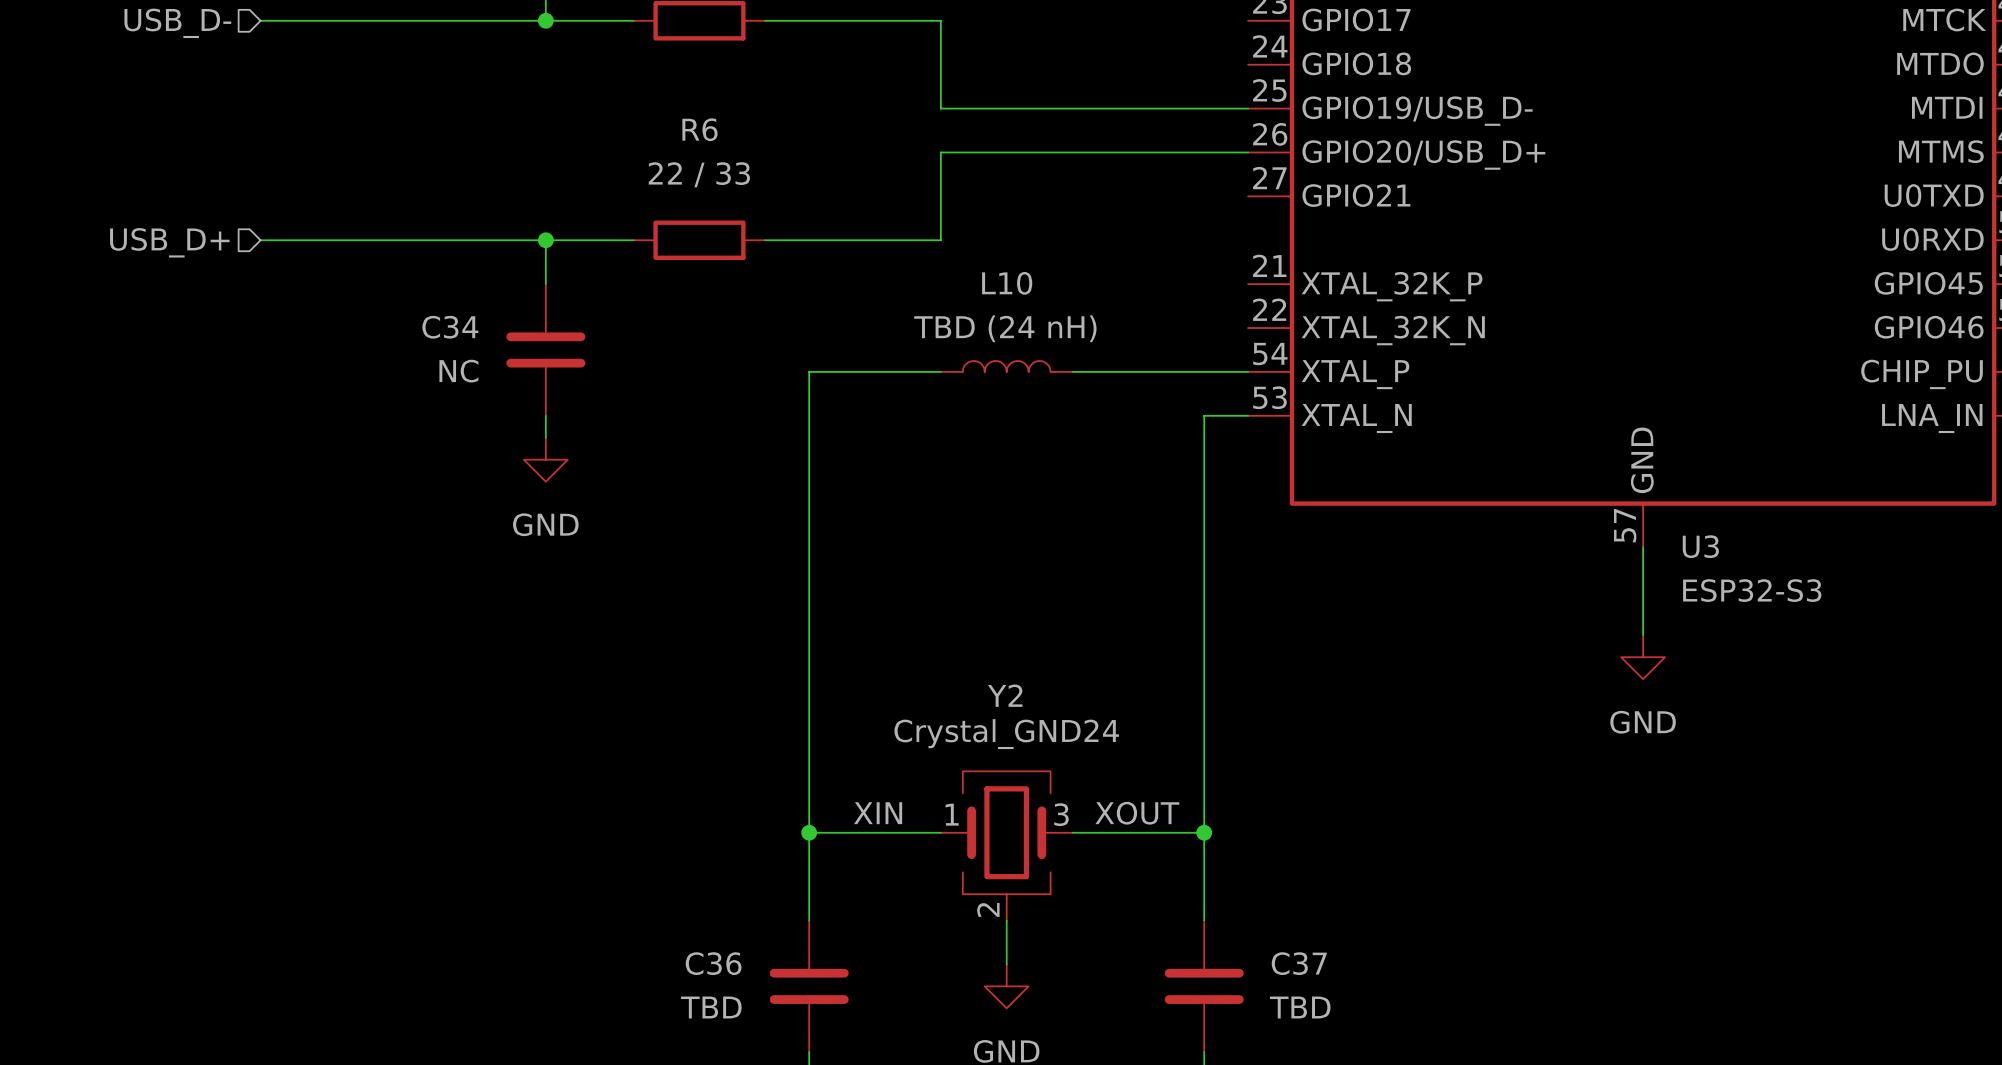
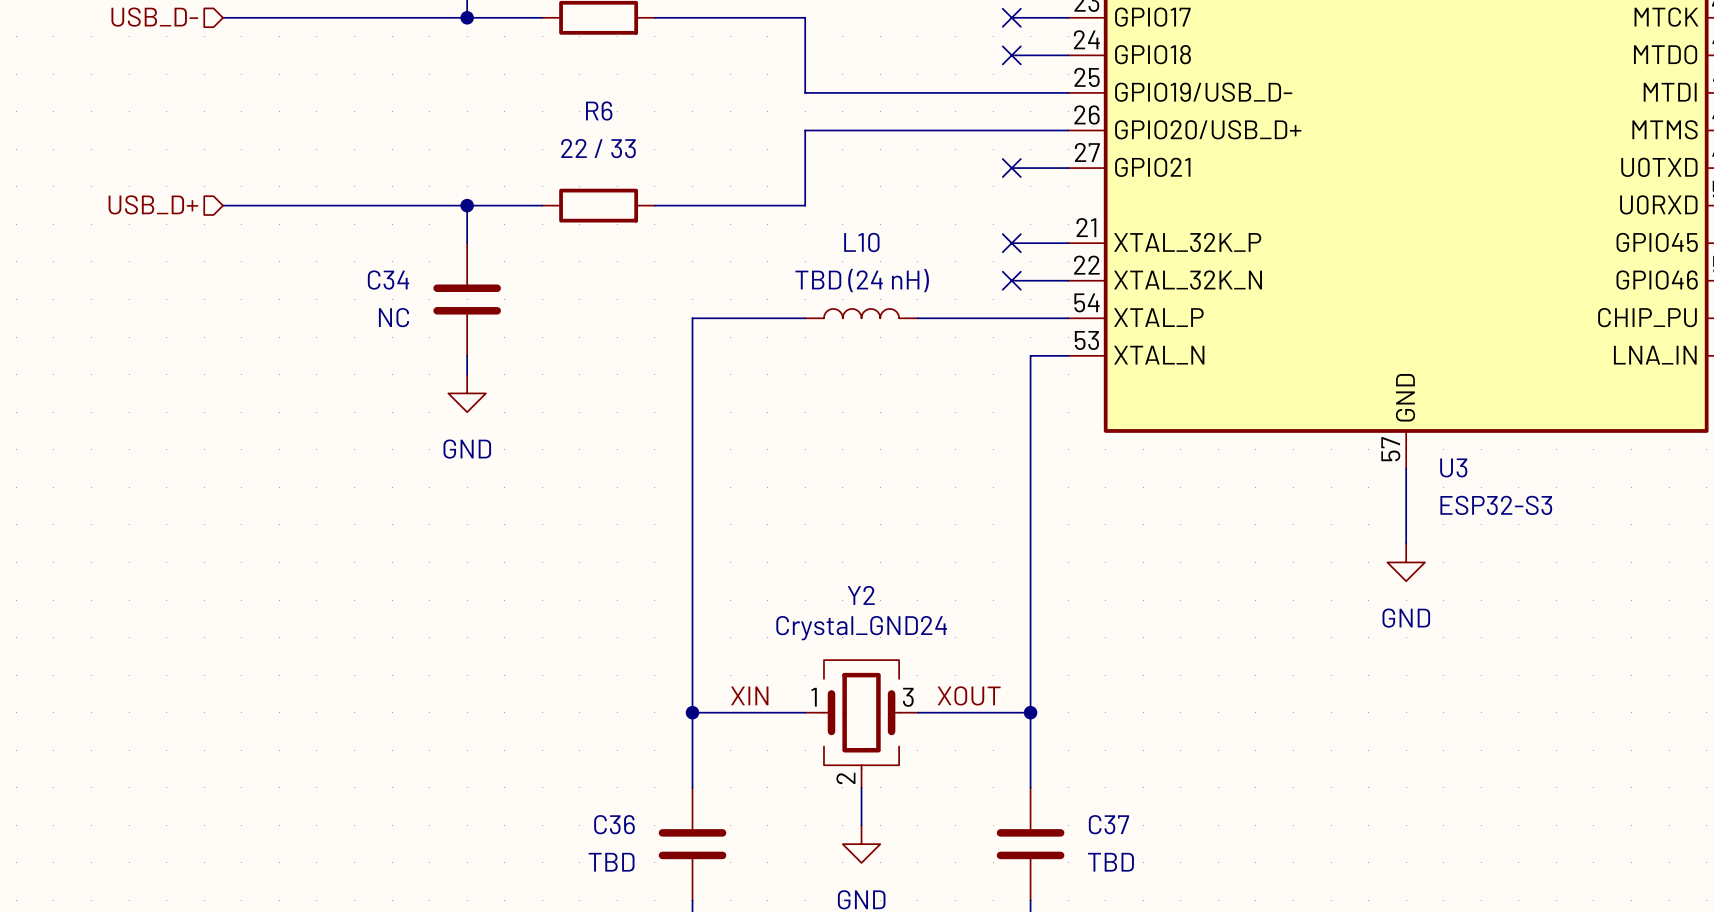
wire: none -> (1011, 17) (1068, 17)
no-connect mark: none -> (1011, 17)
wire: none -> (1011, 55) (1068, 55)
no-connect mark: none -> (1011, 55)
wire: none -> (1011, 168) (1068, 168)
no-connect mark: none -> (1011, 168)
wire: none -> (1011, 243) (1068, 243)
no-connect mark: none -> (1011, 243)
wire: none -> (1011, 280) (1068, 280)
no-connect mark: none -> (1011, 280)

